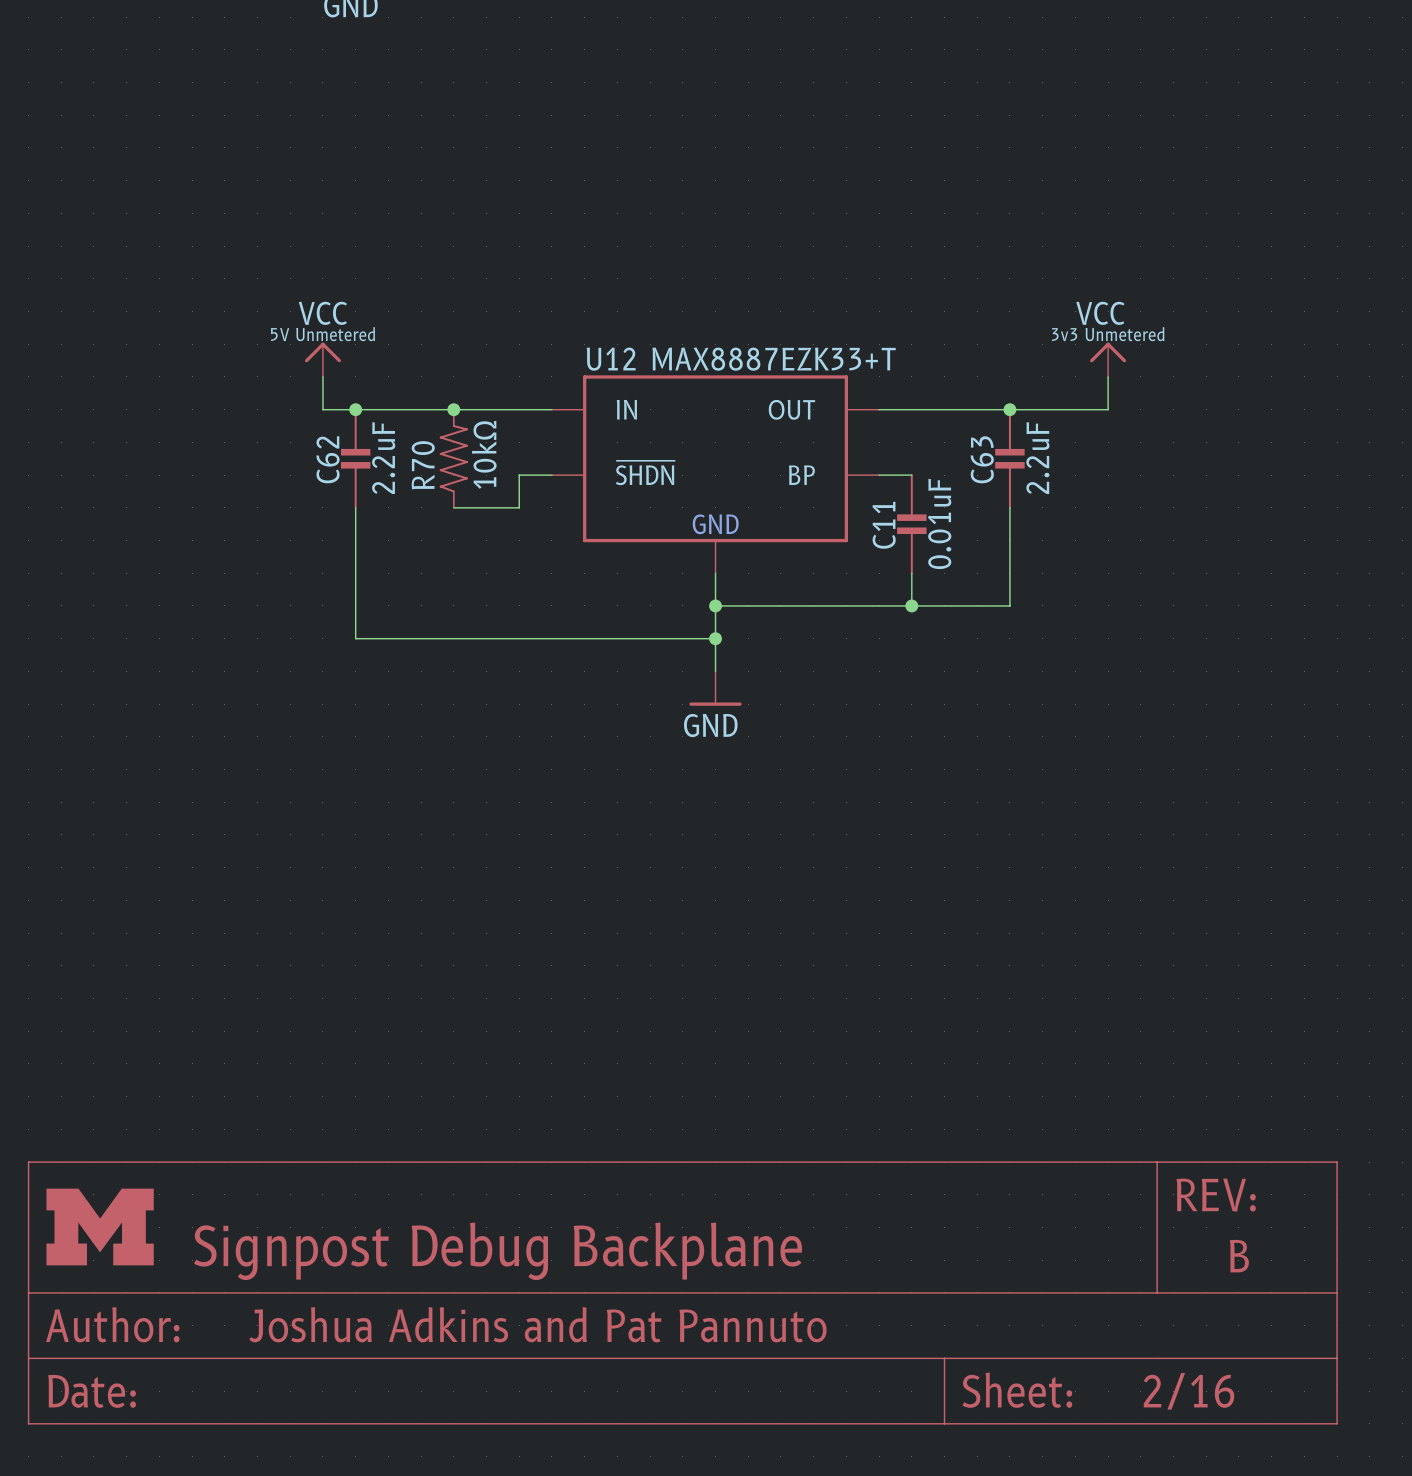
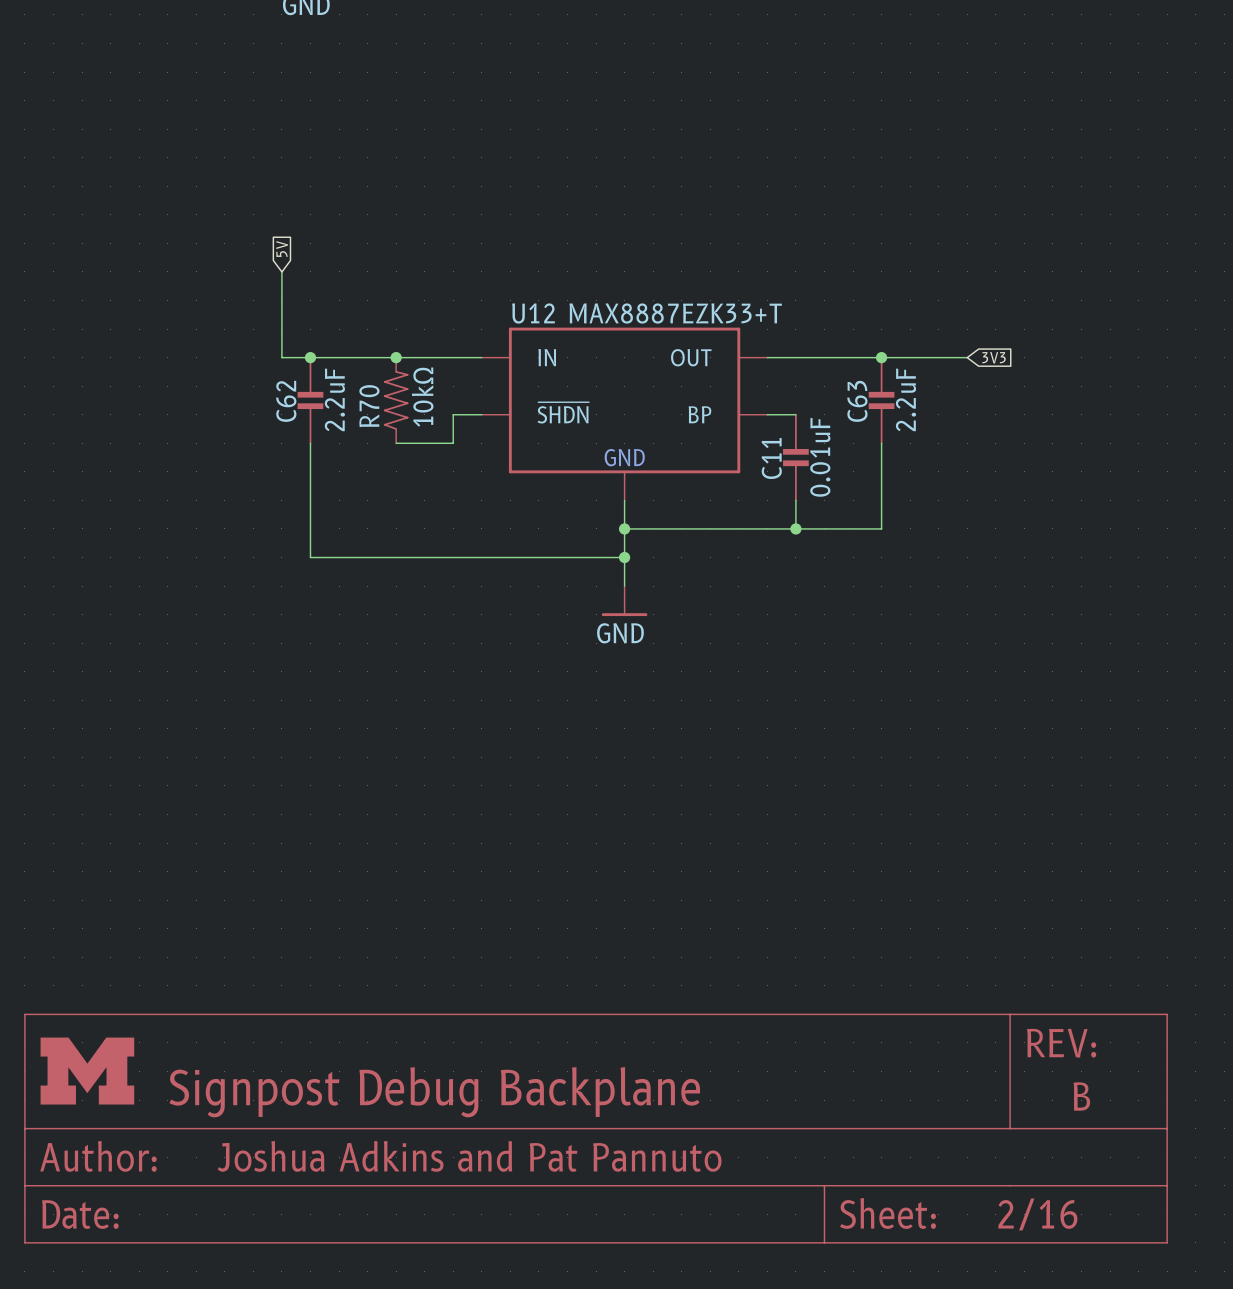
global label: none -> 5V (282, 248)
power symbol: (322, 359) -> none
power symbol: (1108, 359) -> none
wire: (1108, 376) (1108, 409) -> none
global label: none -> 3V3 (994, 357)

